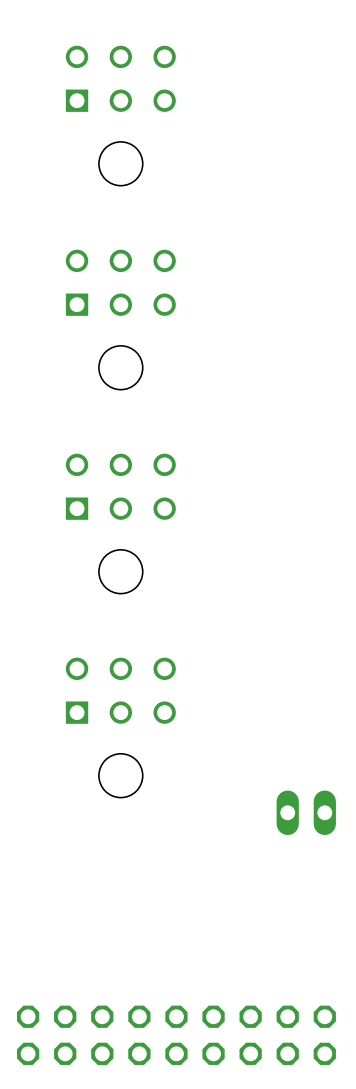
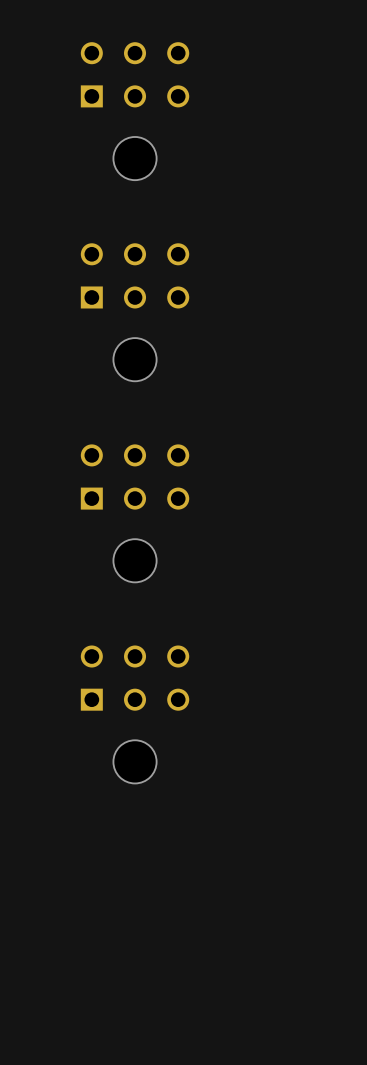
part: (306, 812) -> none
part: (176, 1035) -> none

